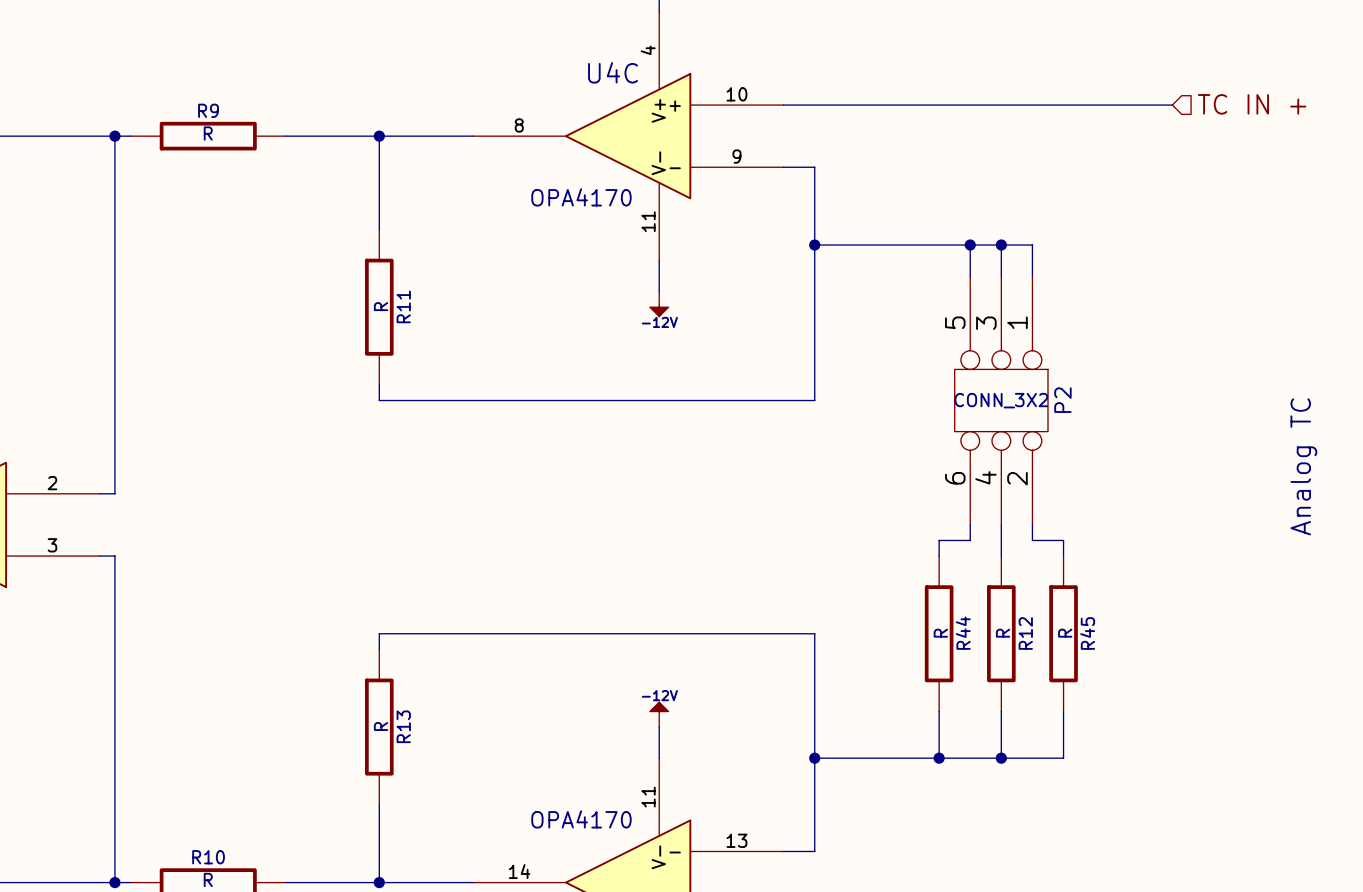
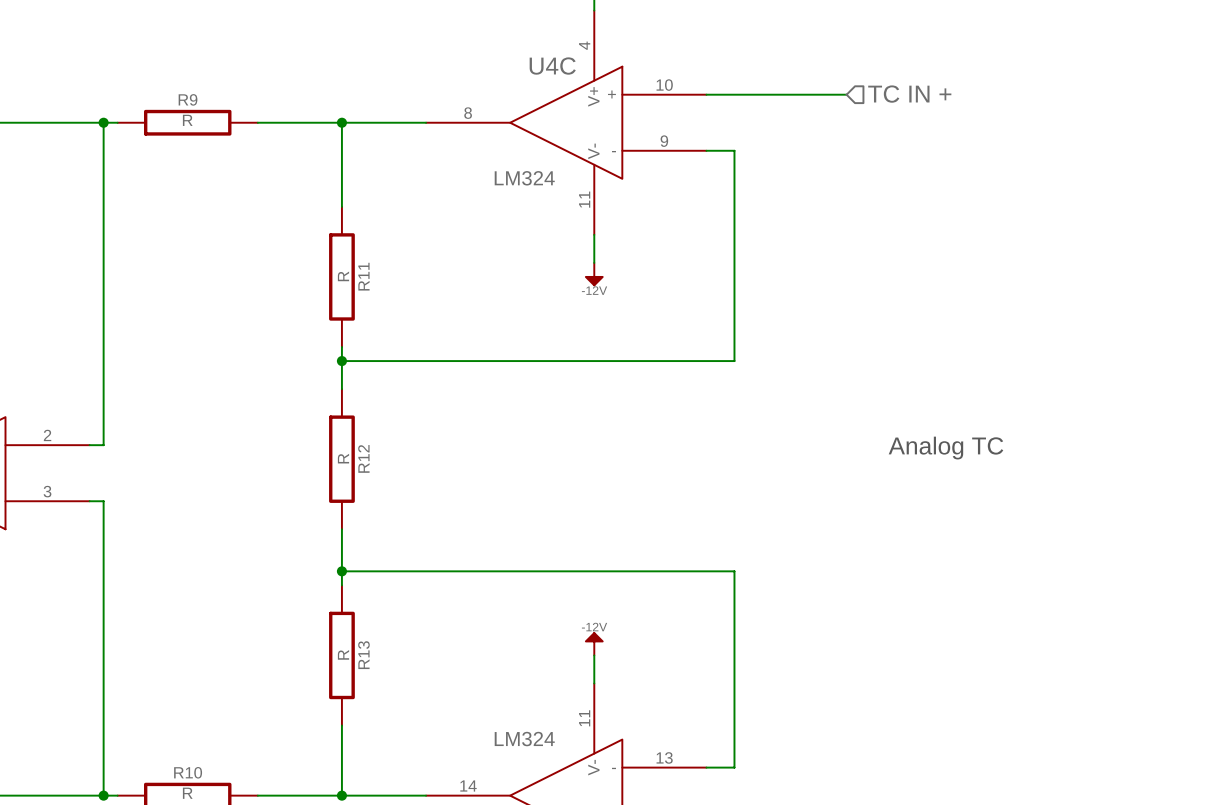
hierarchical label position: TC IN + (1252, 104) -> TC IN + (909, 94)
wire: (939, 105) (1172, 105) -> none
U4C value: OPA4170 (581, 197) -> LM324 (524, 178)
wire: (814, 245) (1032, 245) (1032, 276) -> none
junction: (814, 245) -> none
wire: (970, 245) (970, 276) -> none
junction: (970, 245) -> none
wire: (1001, 245) (1001, 276) -> none
junction: (1001, 245) -> none
wire: none -> (341, 361) (341, 389)
junction: none -> (341, 361)
P2: CONN_3X2 (1001, 400) -> none
text: Analog TC (1303, 466) -> none
text: none -> Analog TC (946, 448)
wire: (970, 524) (970, 540) (939, 540) (939, 556) -> none
wire: (1001, 524) (1001, 556) -> none
wire: (1032, 524) (1032, 540) (1063, 540) (1063, 556) -> none
wire: none -> (341, 529) (341, 571)
junction: none -> (341, 571)
R44: R (939, 633) -> none
R12 position: (1001, 633) -> (341, 459)
R45: R (1063, 633) -> none
wire: (939, 711) (939, 758) -> none
wire: (1001, 711) (1001, 758) -> none
wire: (1063, 711) (1063, 758) (814, 758) -> none
junction: (814, 758) -> none
junction: (939, 758) -> none
junction: (1001, 758) -> none
part value: OPA4170 (581, 819) -> LM324 (524, 739)

